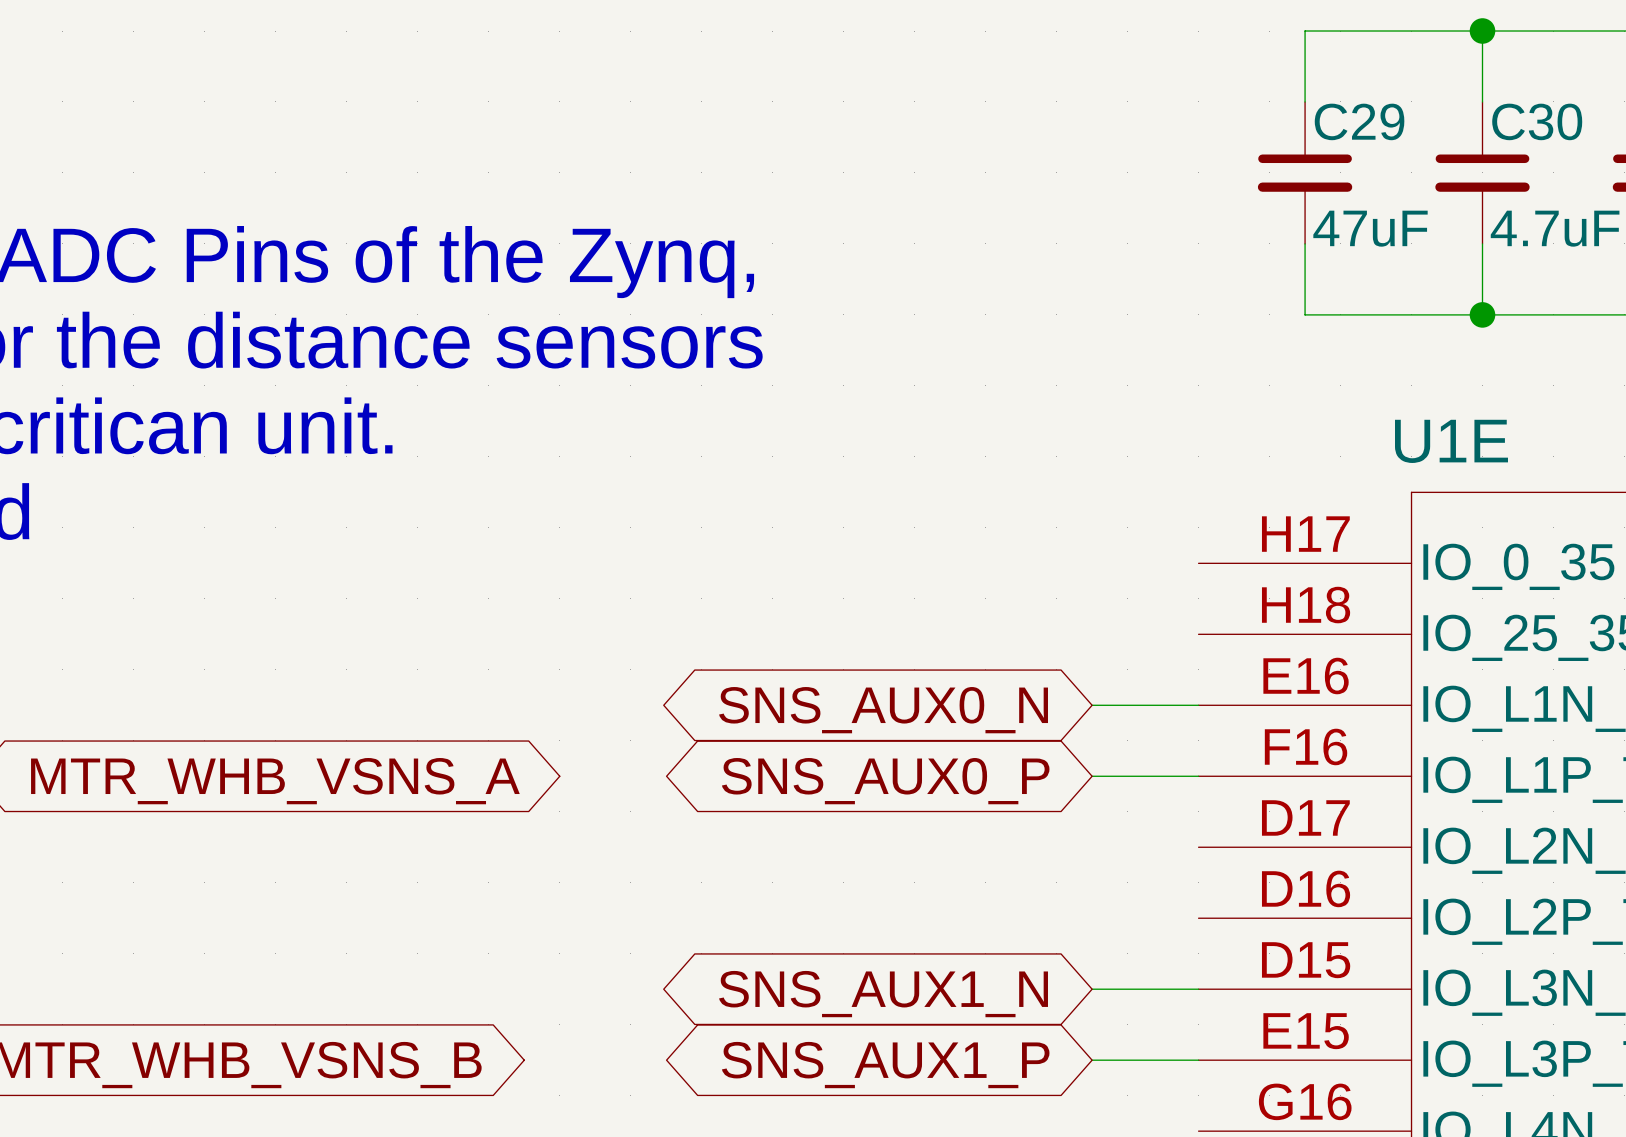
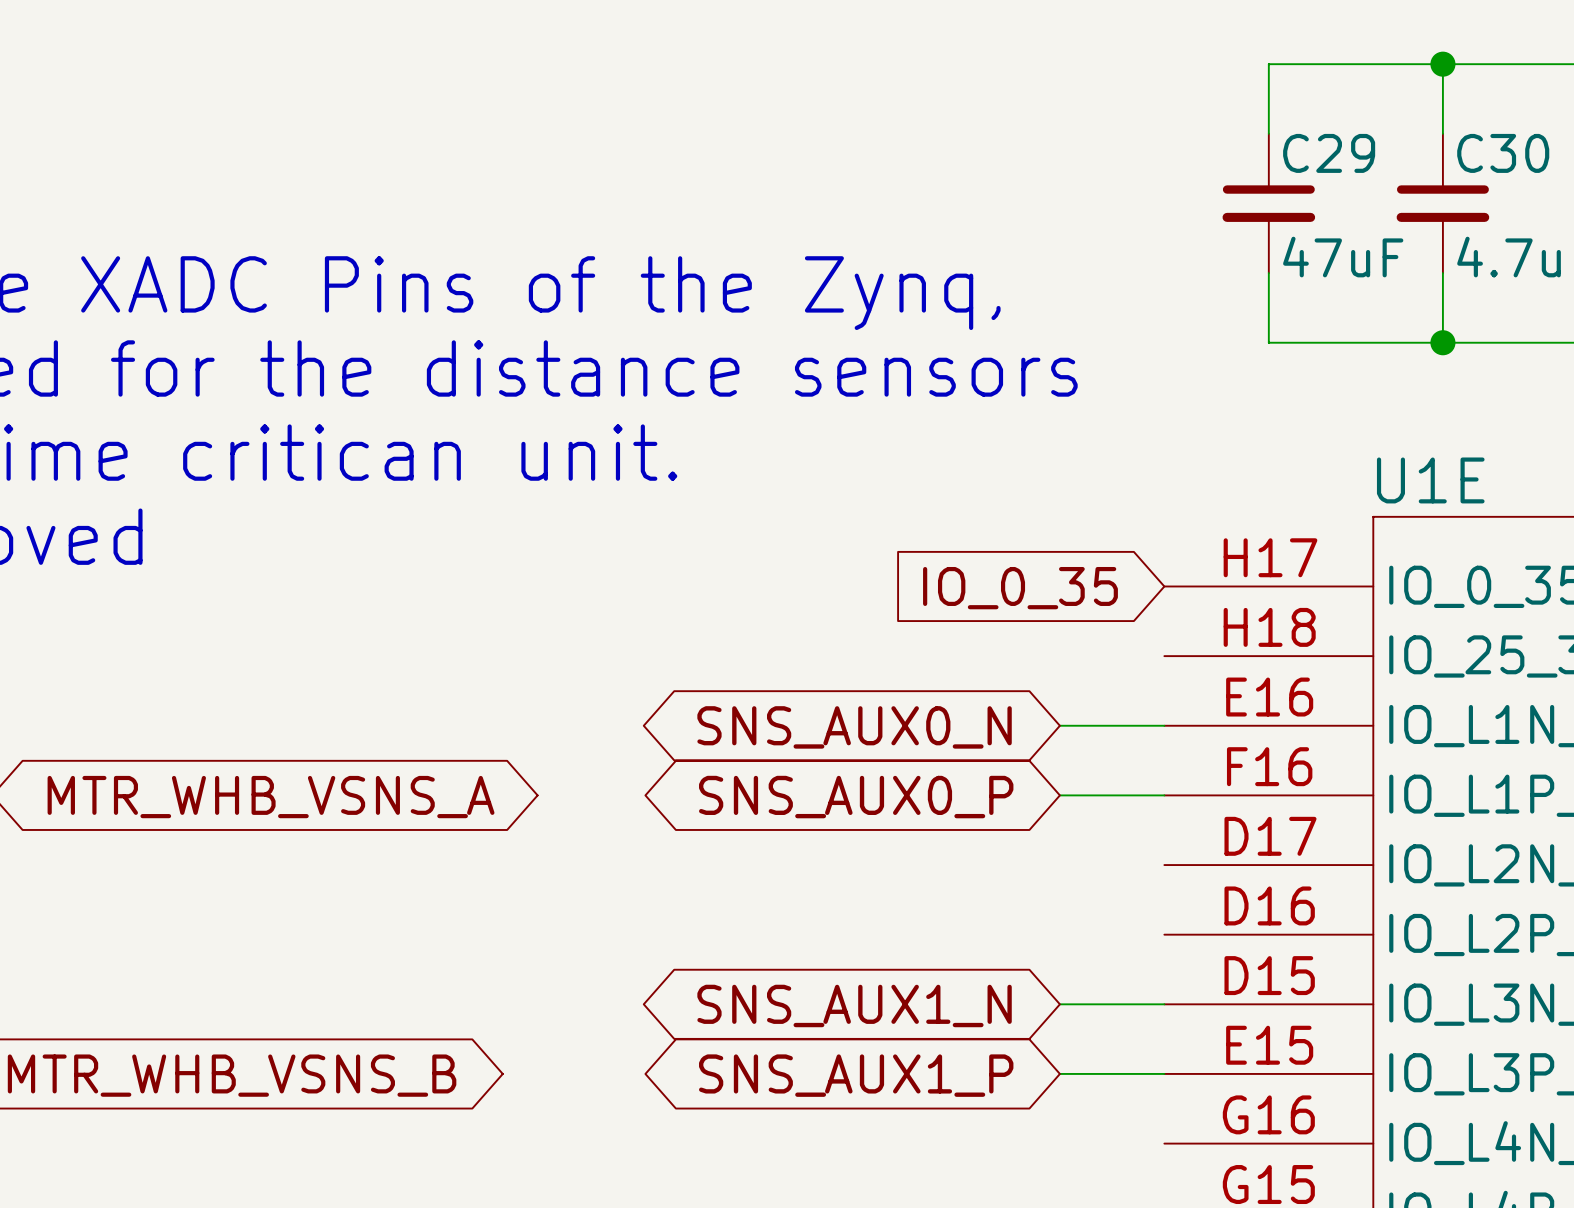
U1E name position: U1E (1451, 441) -> U1E (1430, 480)
global label: none -> IO_0_35 (1020, 588)

